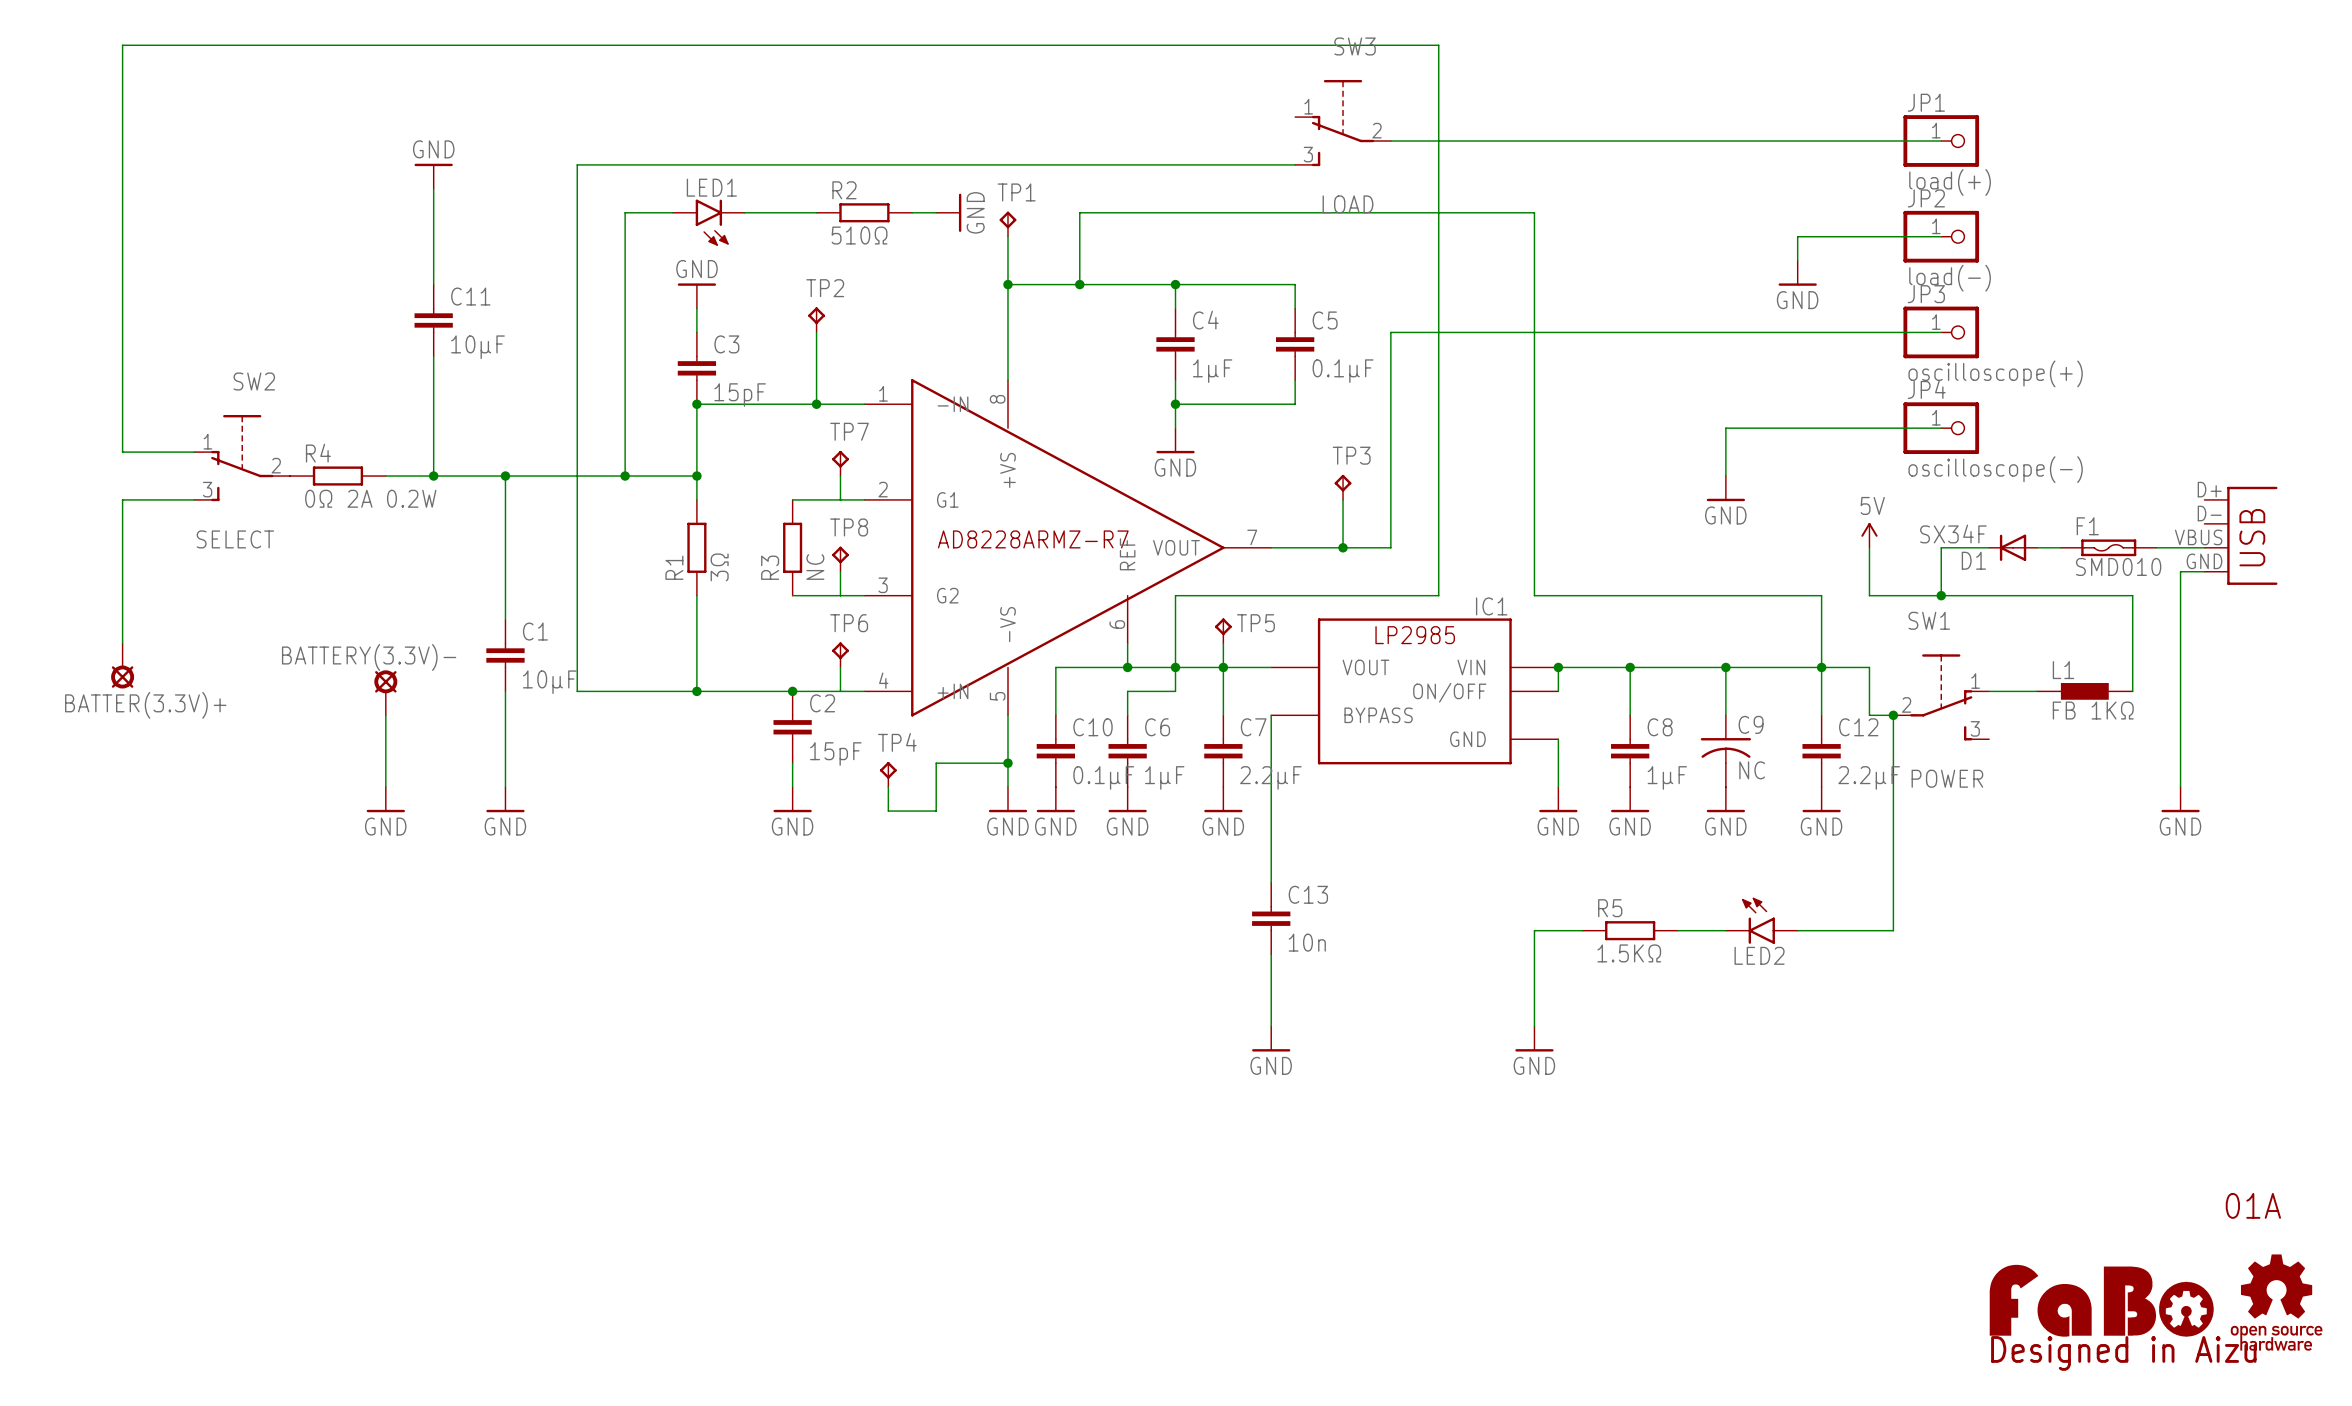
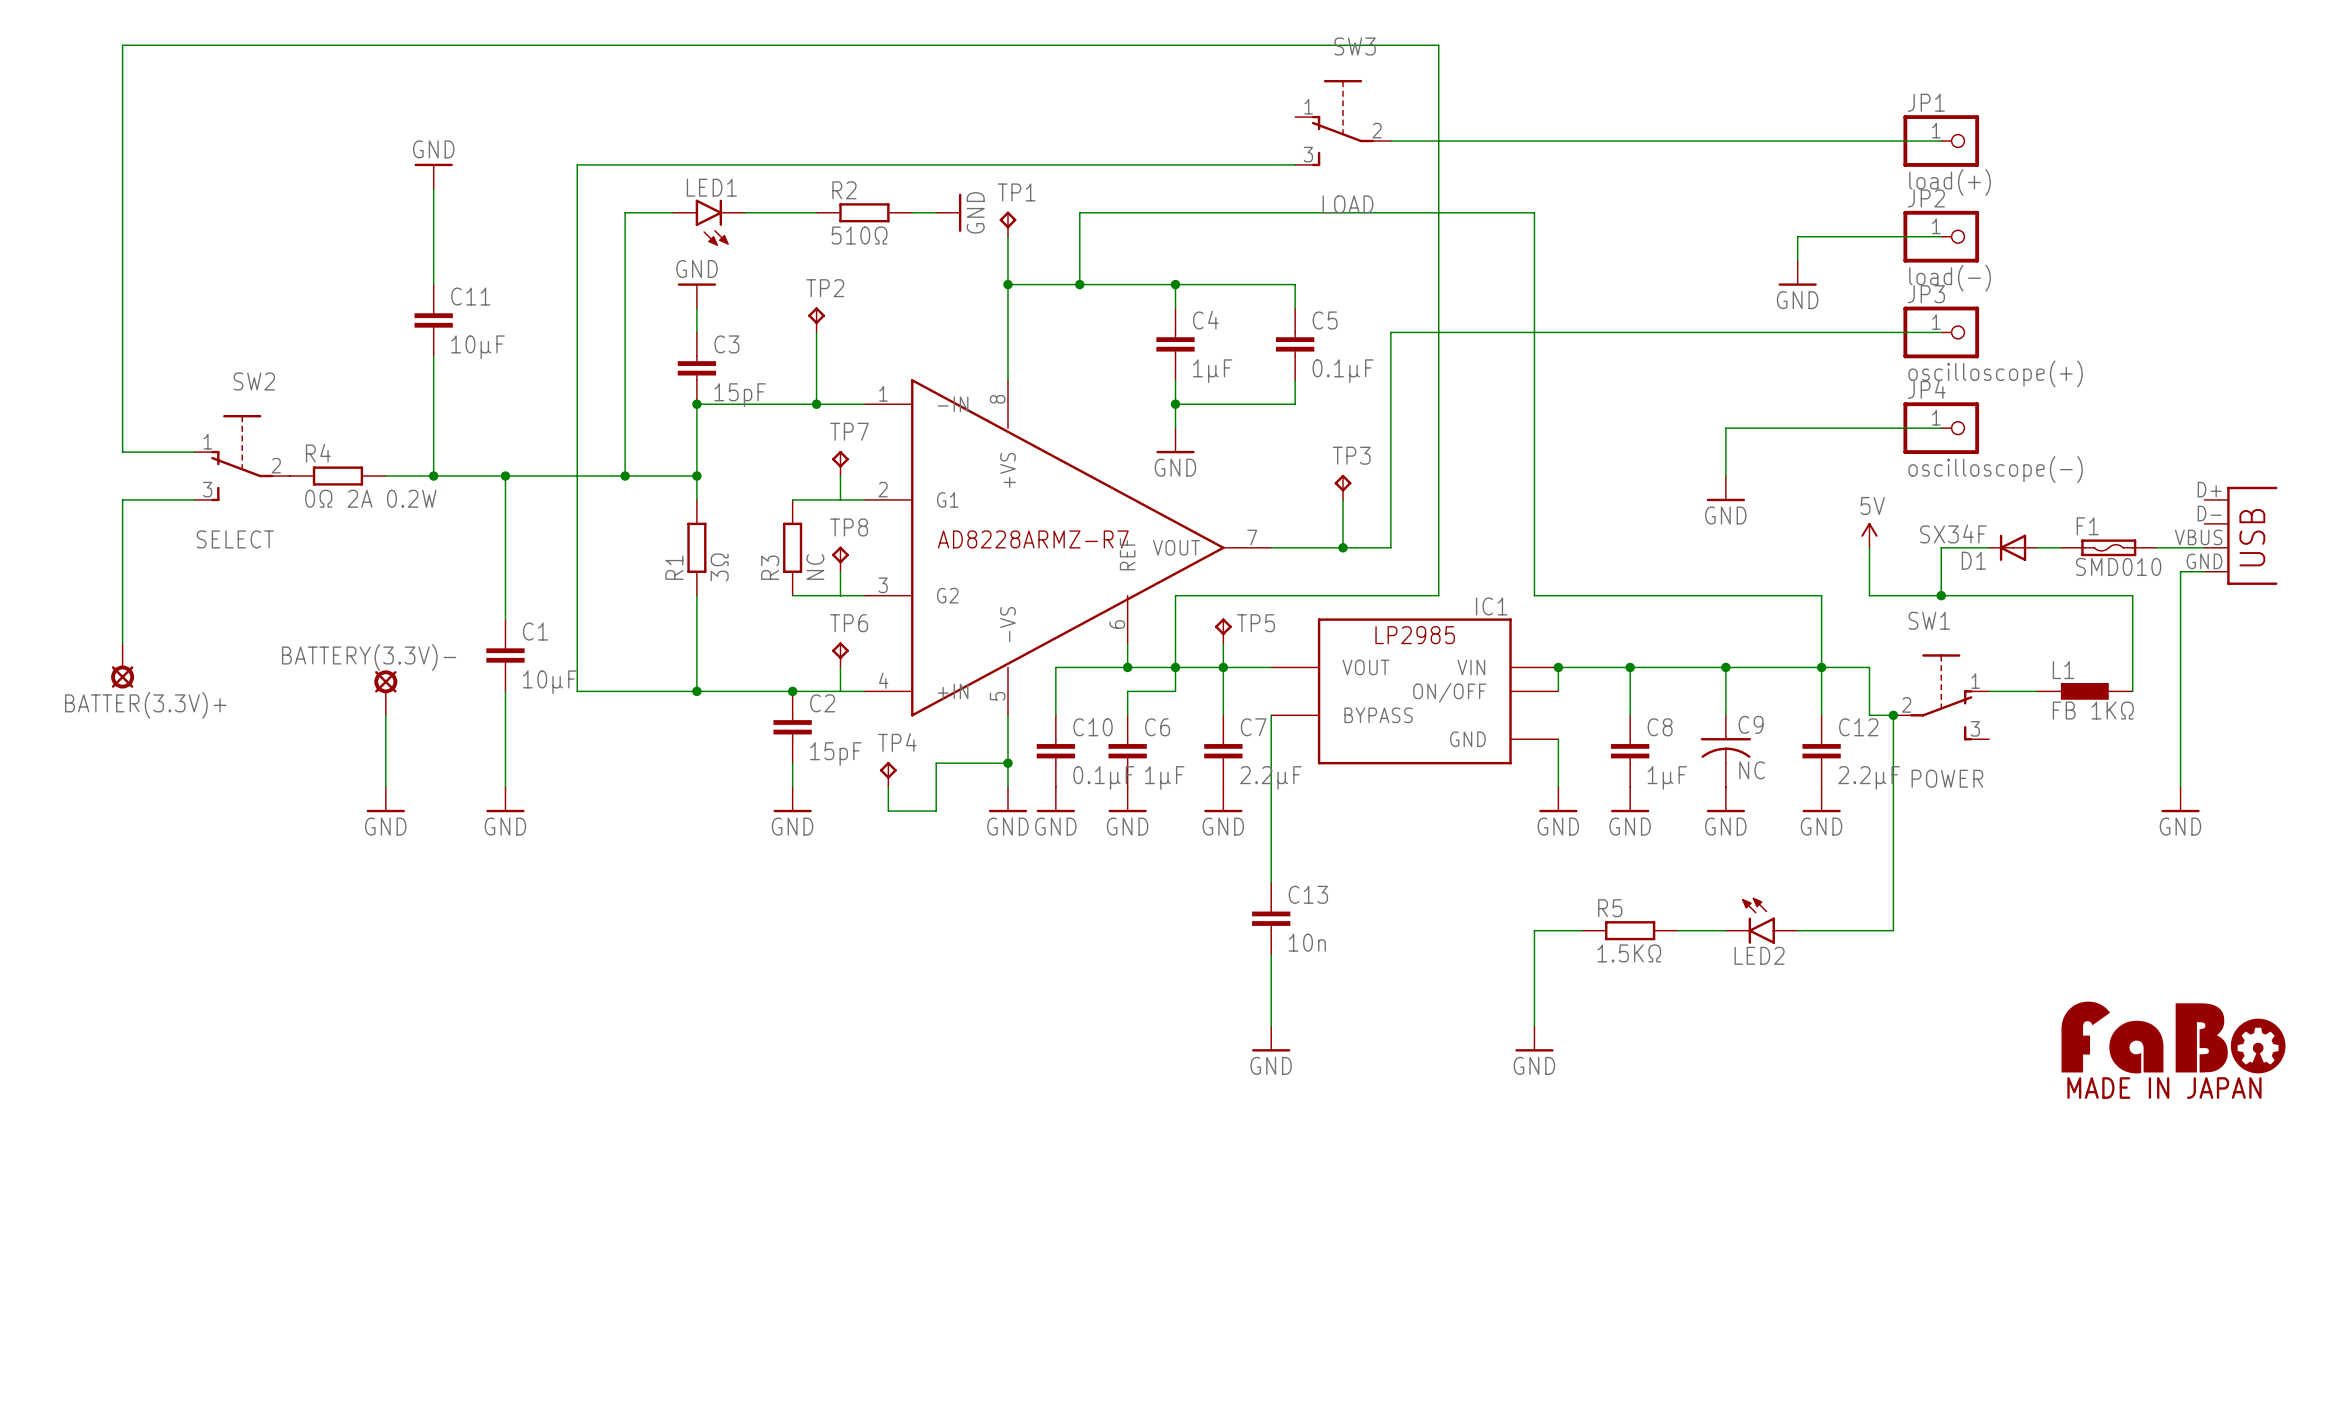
part: none -> (2173, 1037)
text: 01A (2253, 1205) -> none
part: (2101, 1300) -> none
part: (2276, 1302) -> none

